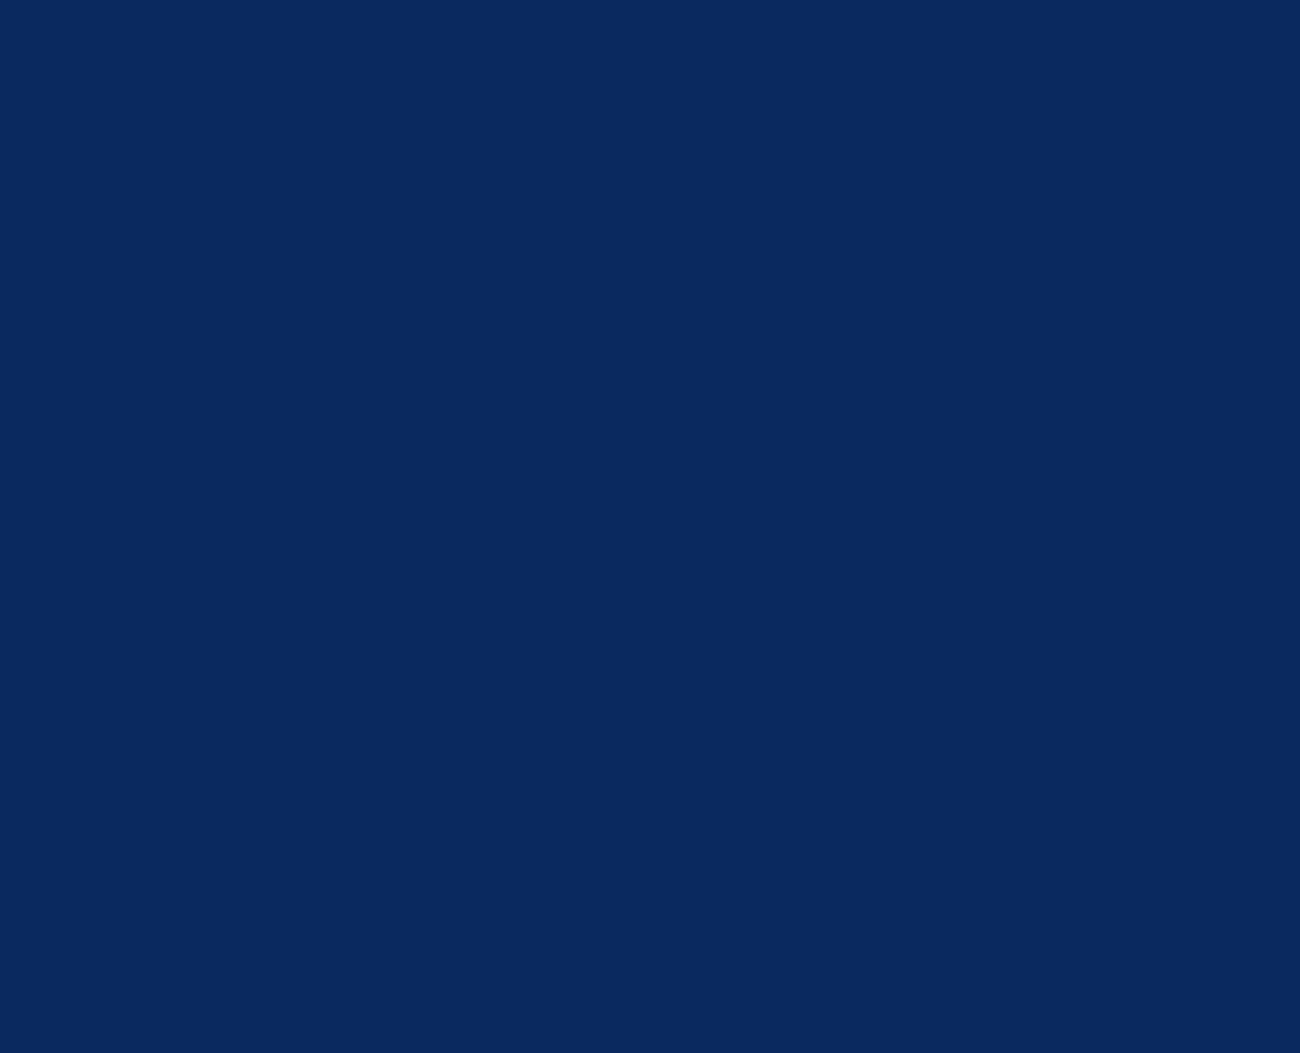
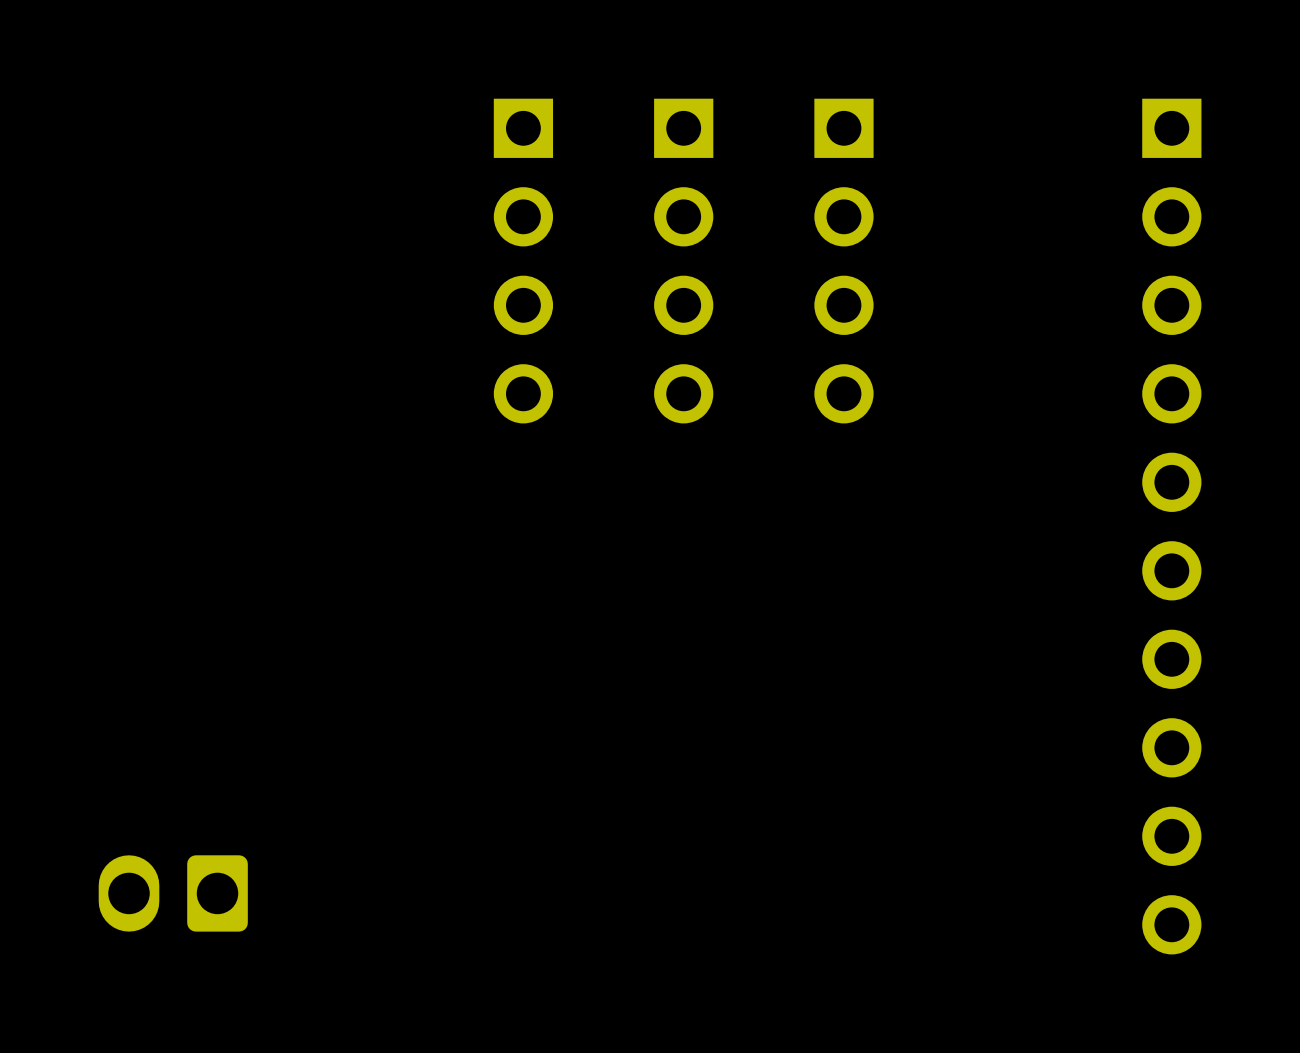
part: none -> (523, 261)
part: none -> (683, 261)
part: none -> (843, 261)
part: none -> (1171, 526)
part: none -> (173, 893)

